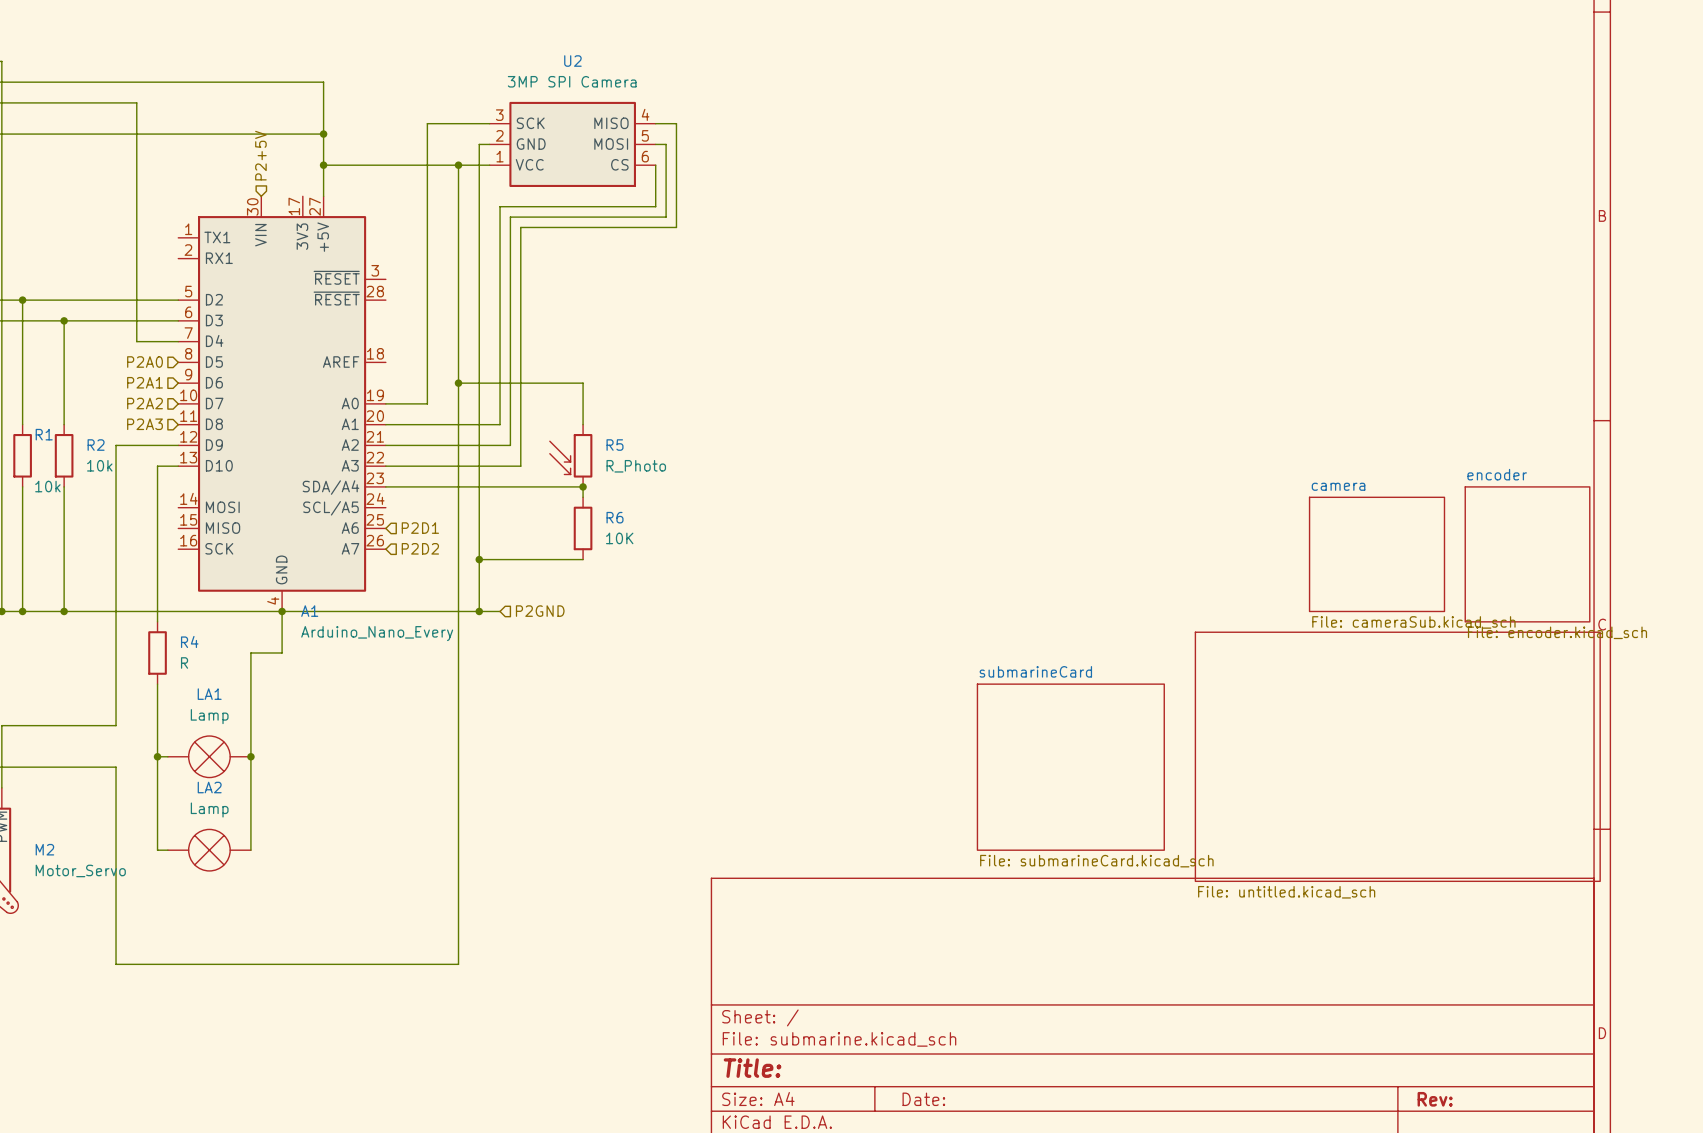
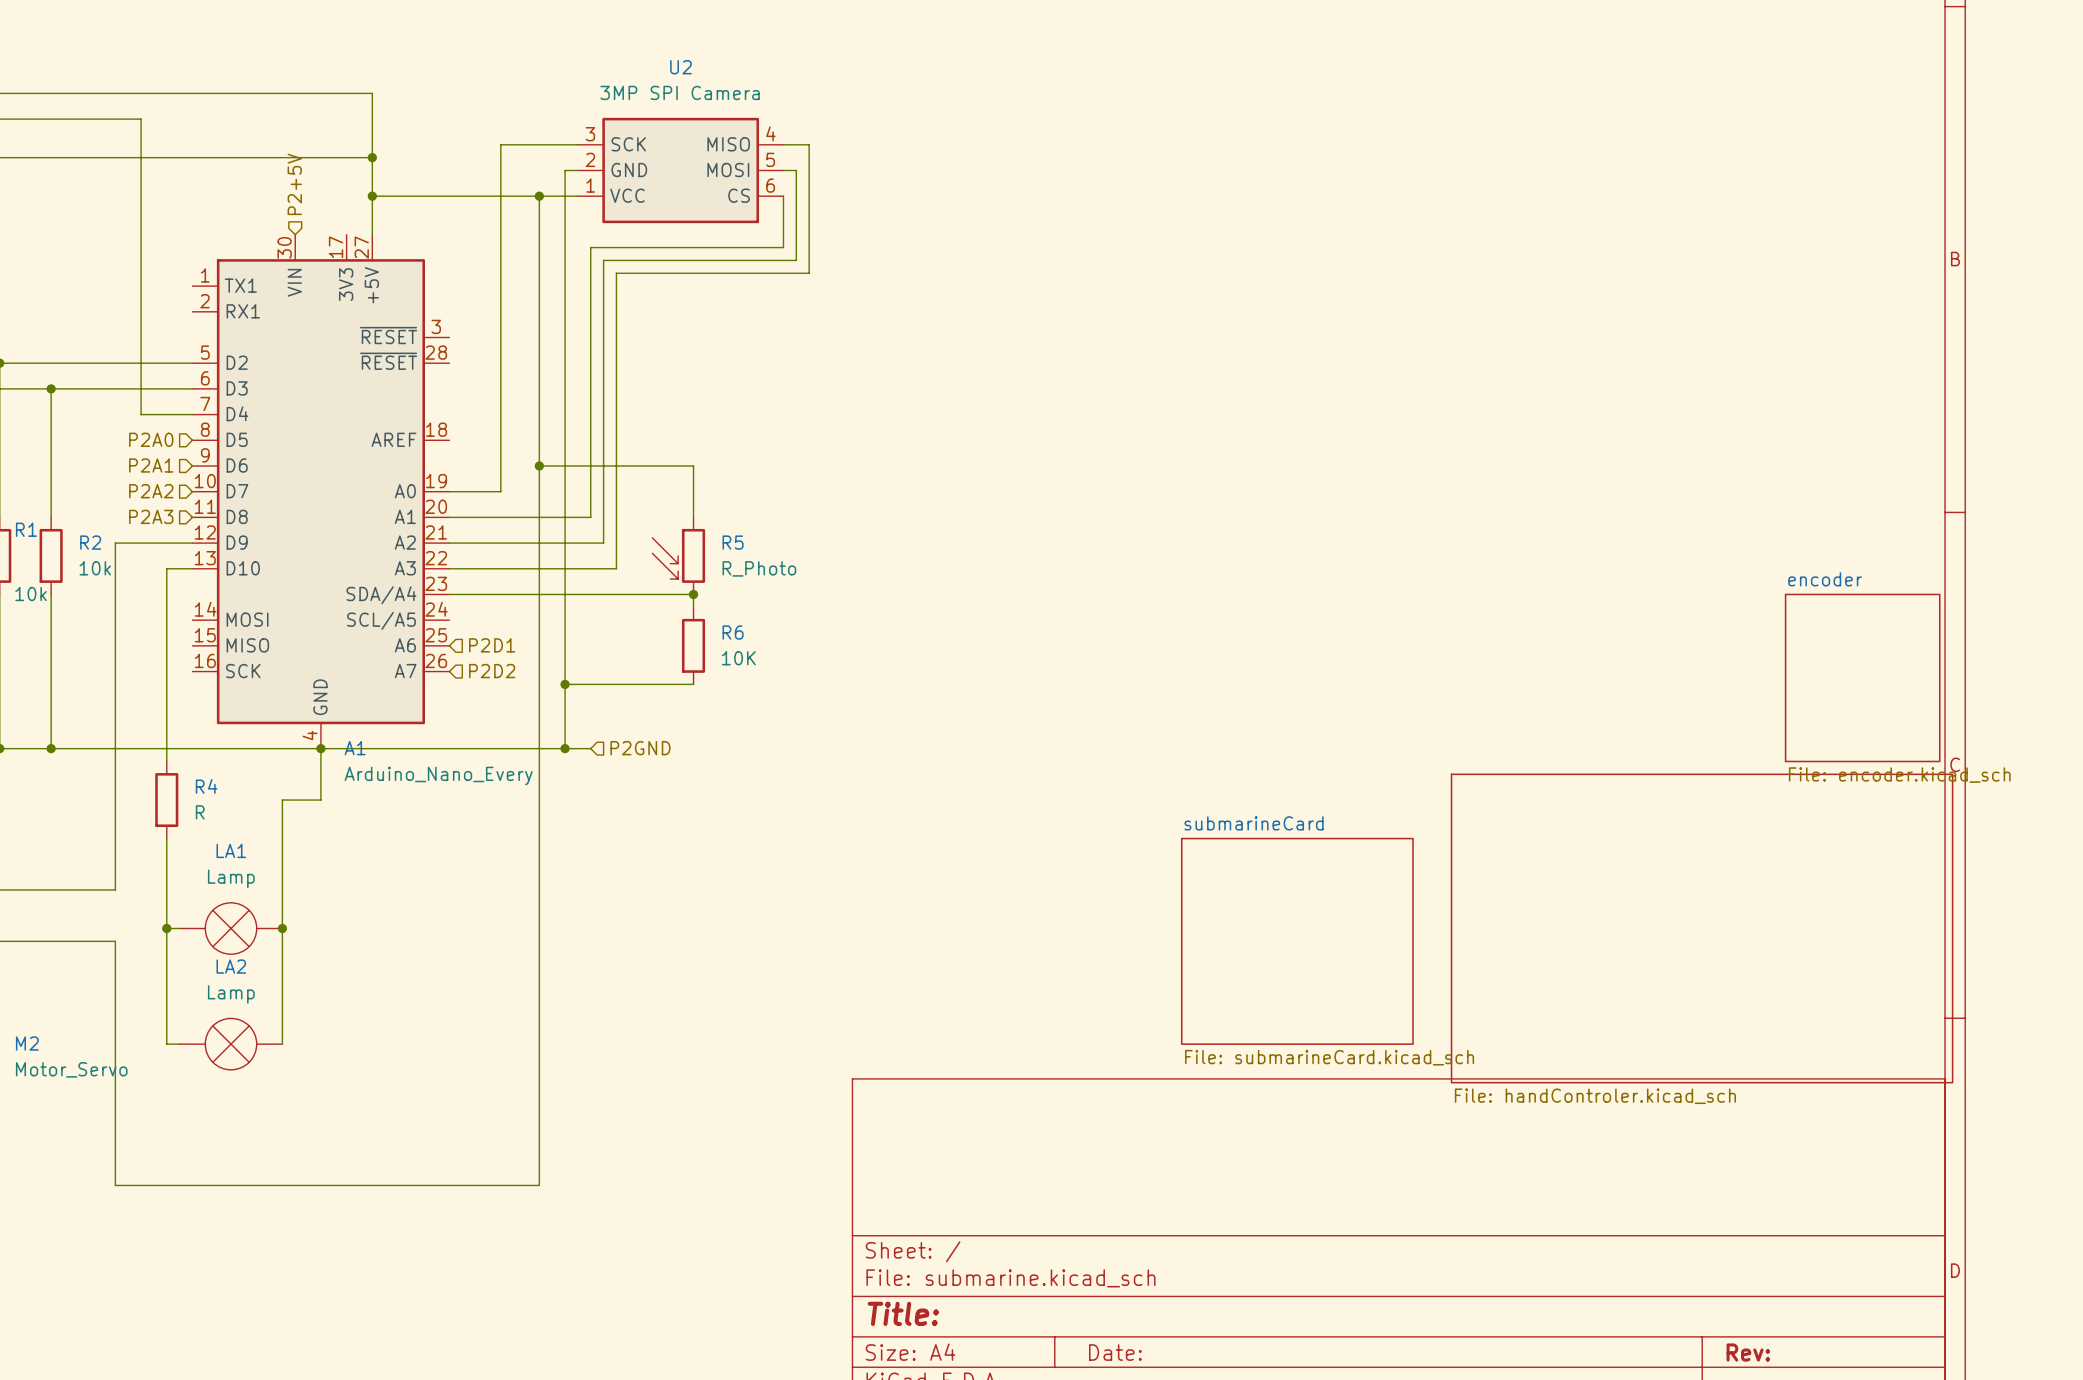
sheet camera: File: cameraSub.kicad_sch (1377, 554) -> none
sheet value: File: untitled.kicad_sch (1286, 892) -> File: handControler.kicad_sch (1595, 1096)

